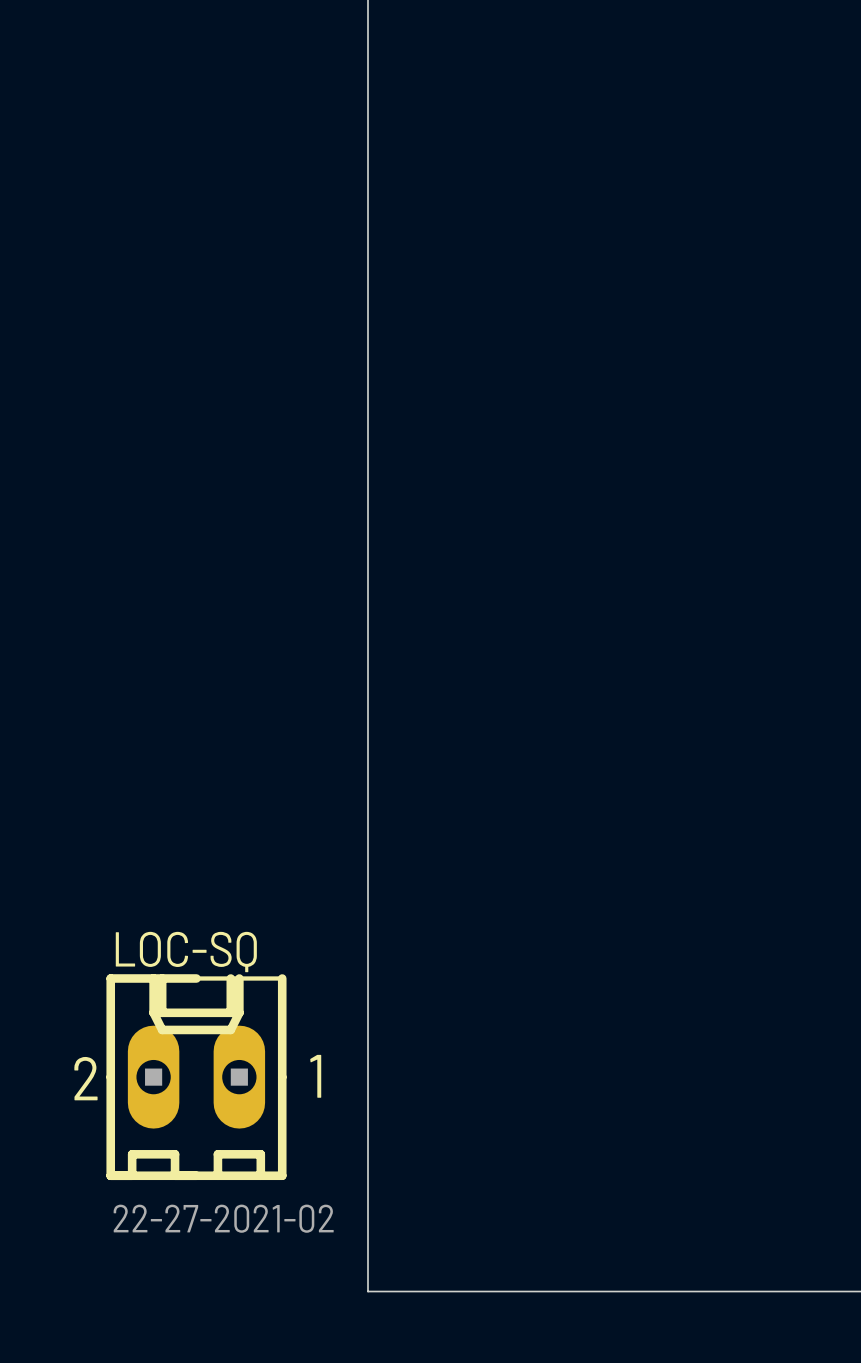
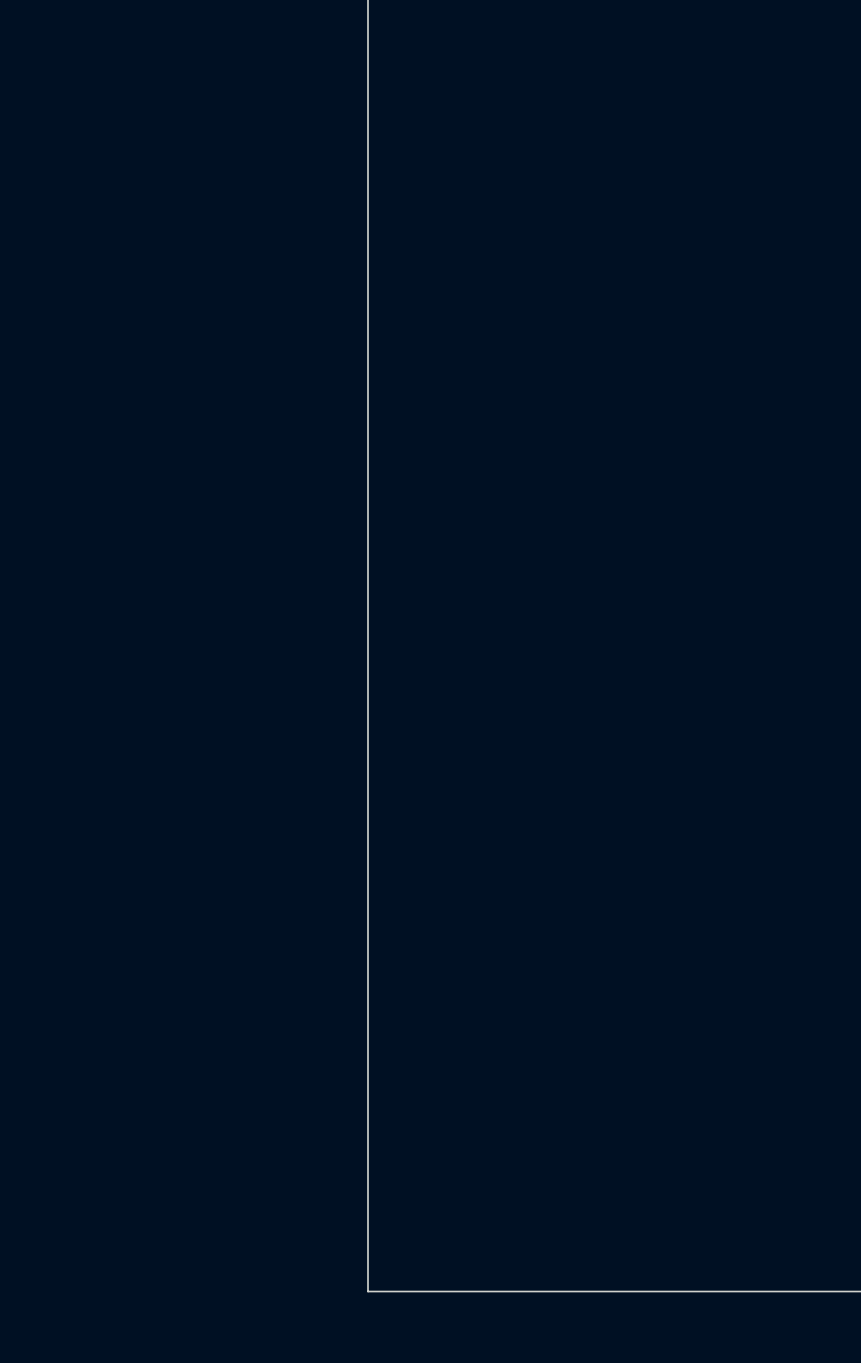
LOC-SQ: 22-27-2021-02 (196, 1077) -> none

